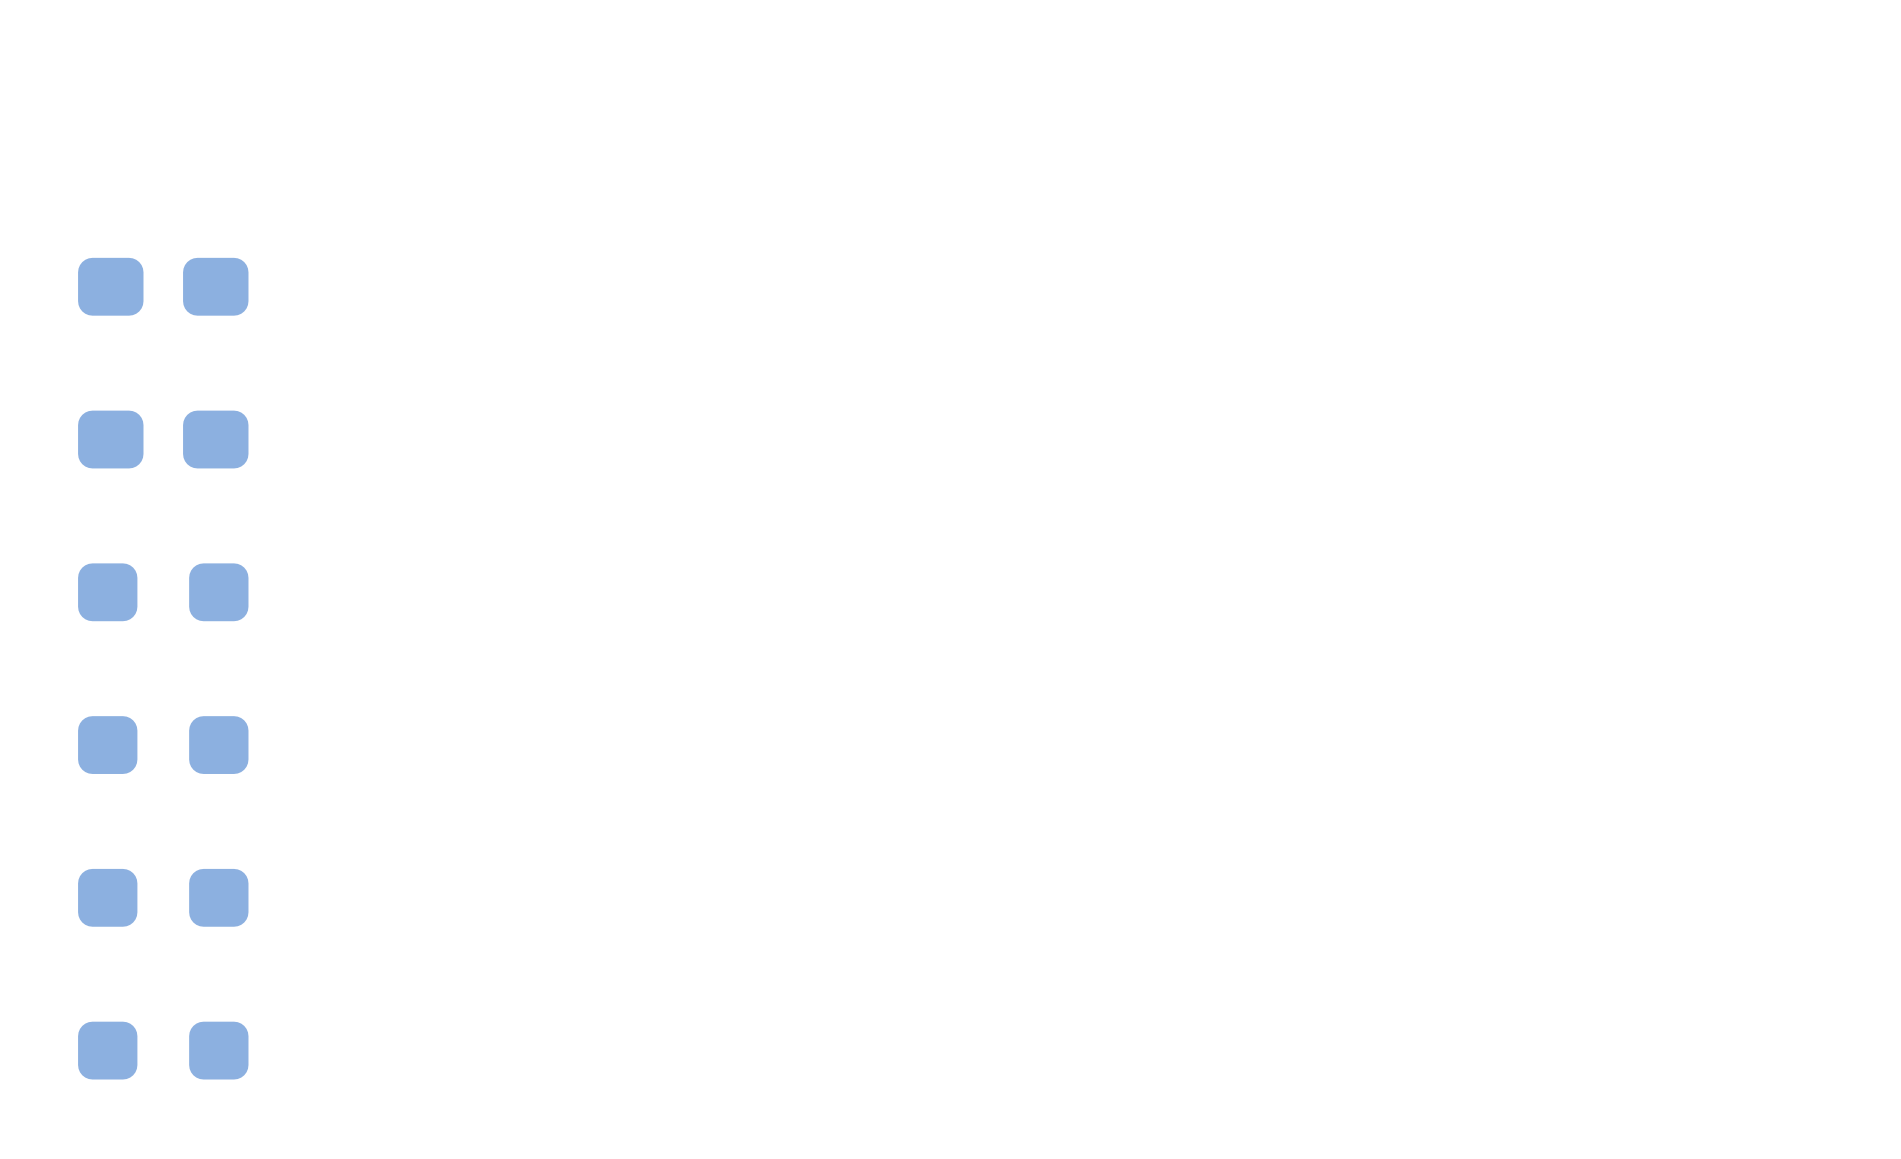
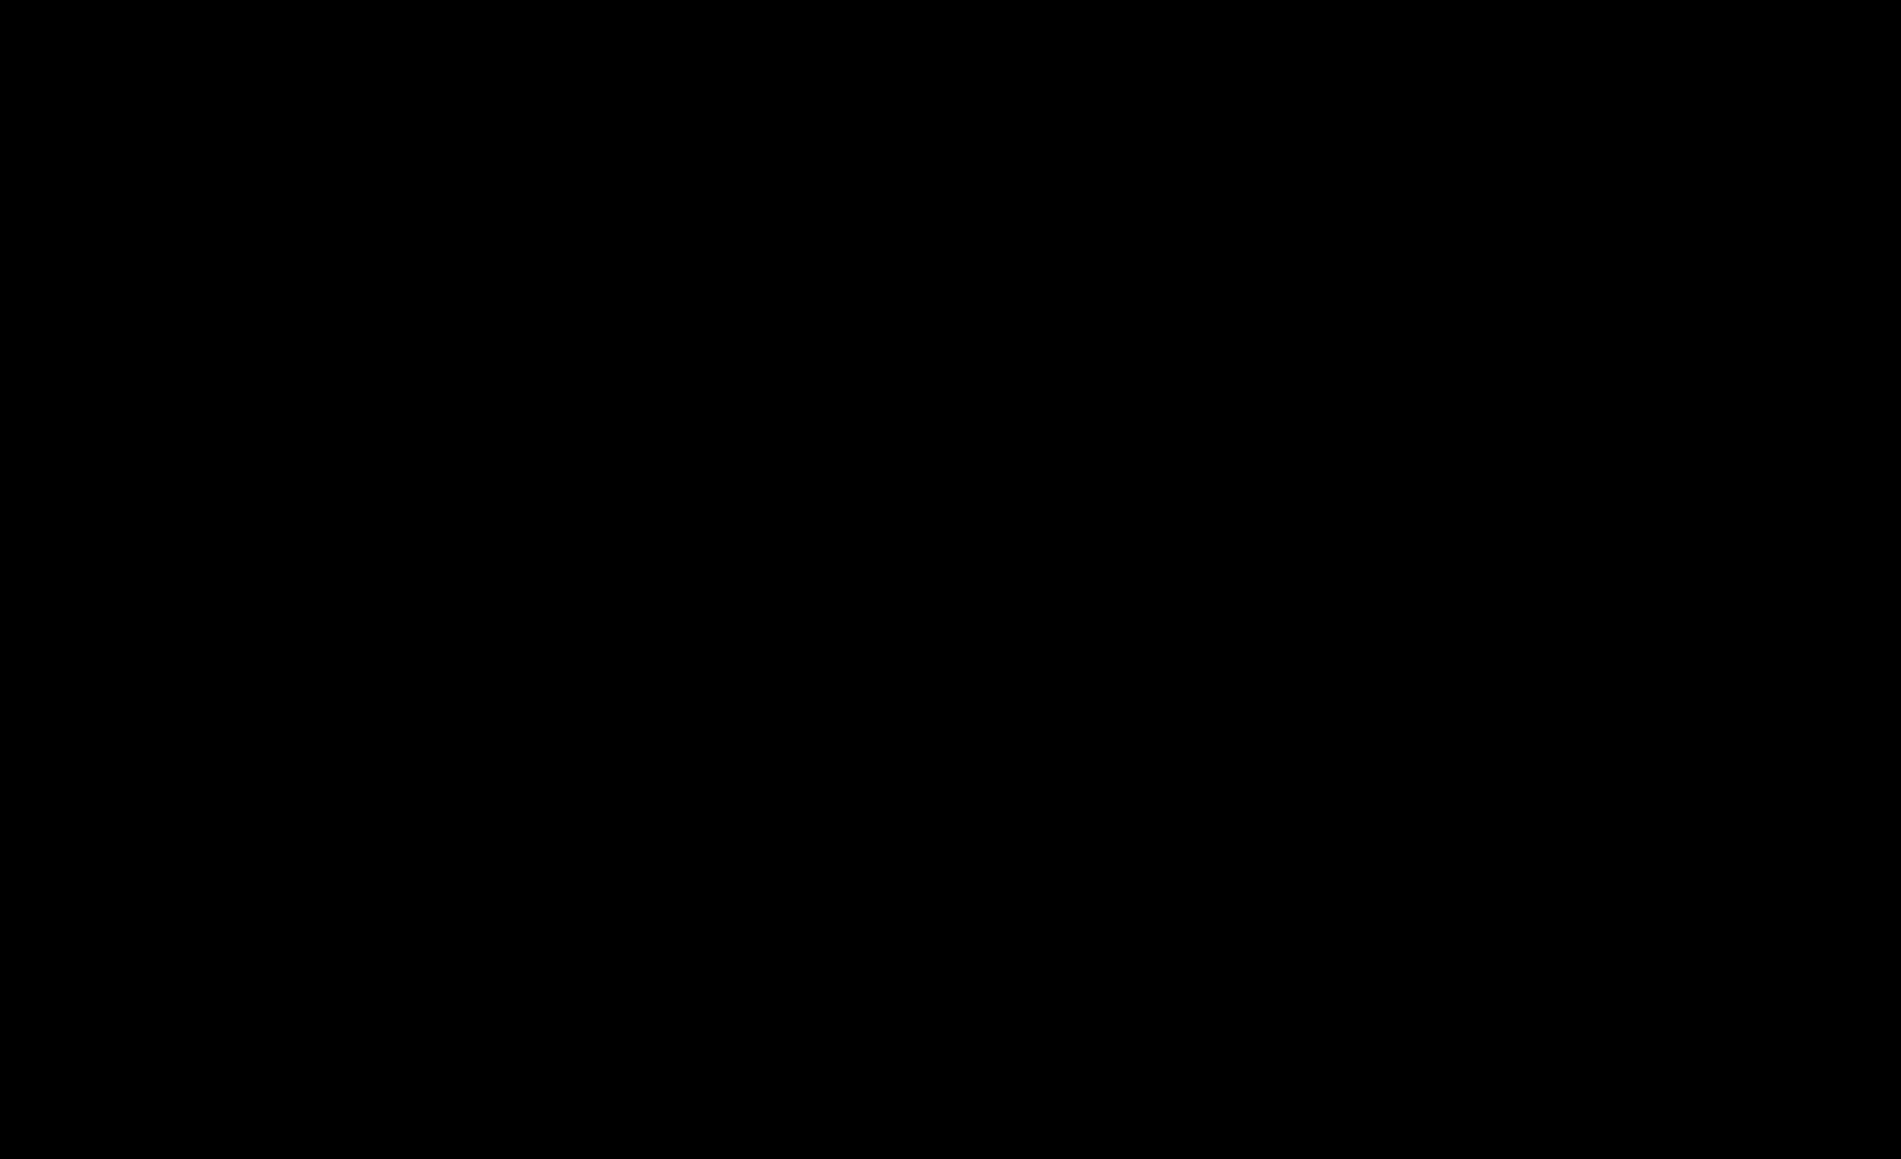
part: (163, 286) -> none
part: (163, 439) -> none
part: (163, 592) -> none
part: (163, 745) -> none
part: (163, 897) -> none
part: (163, 1050) -> none

